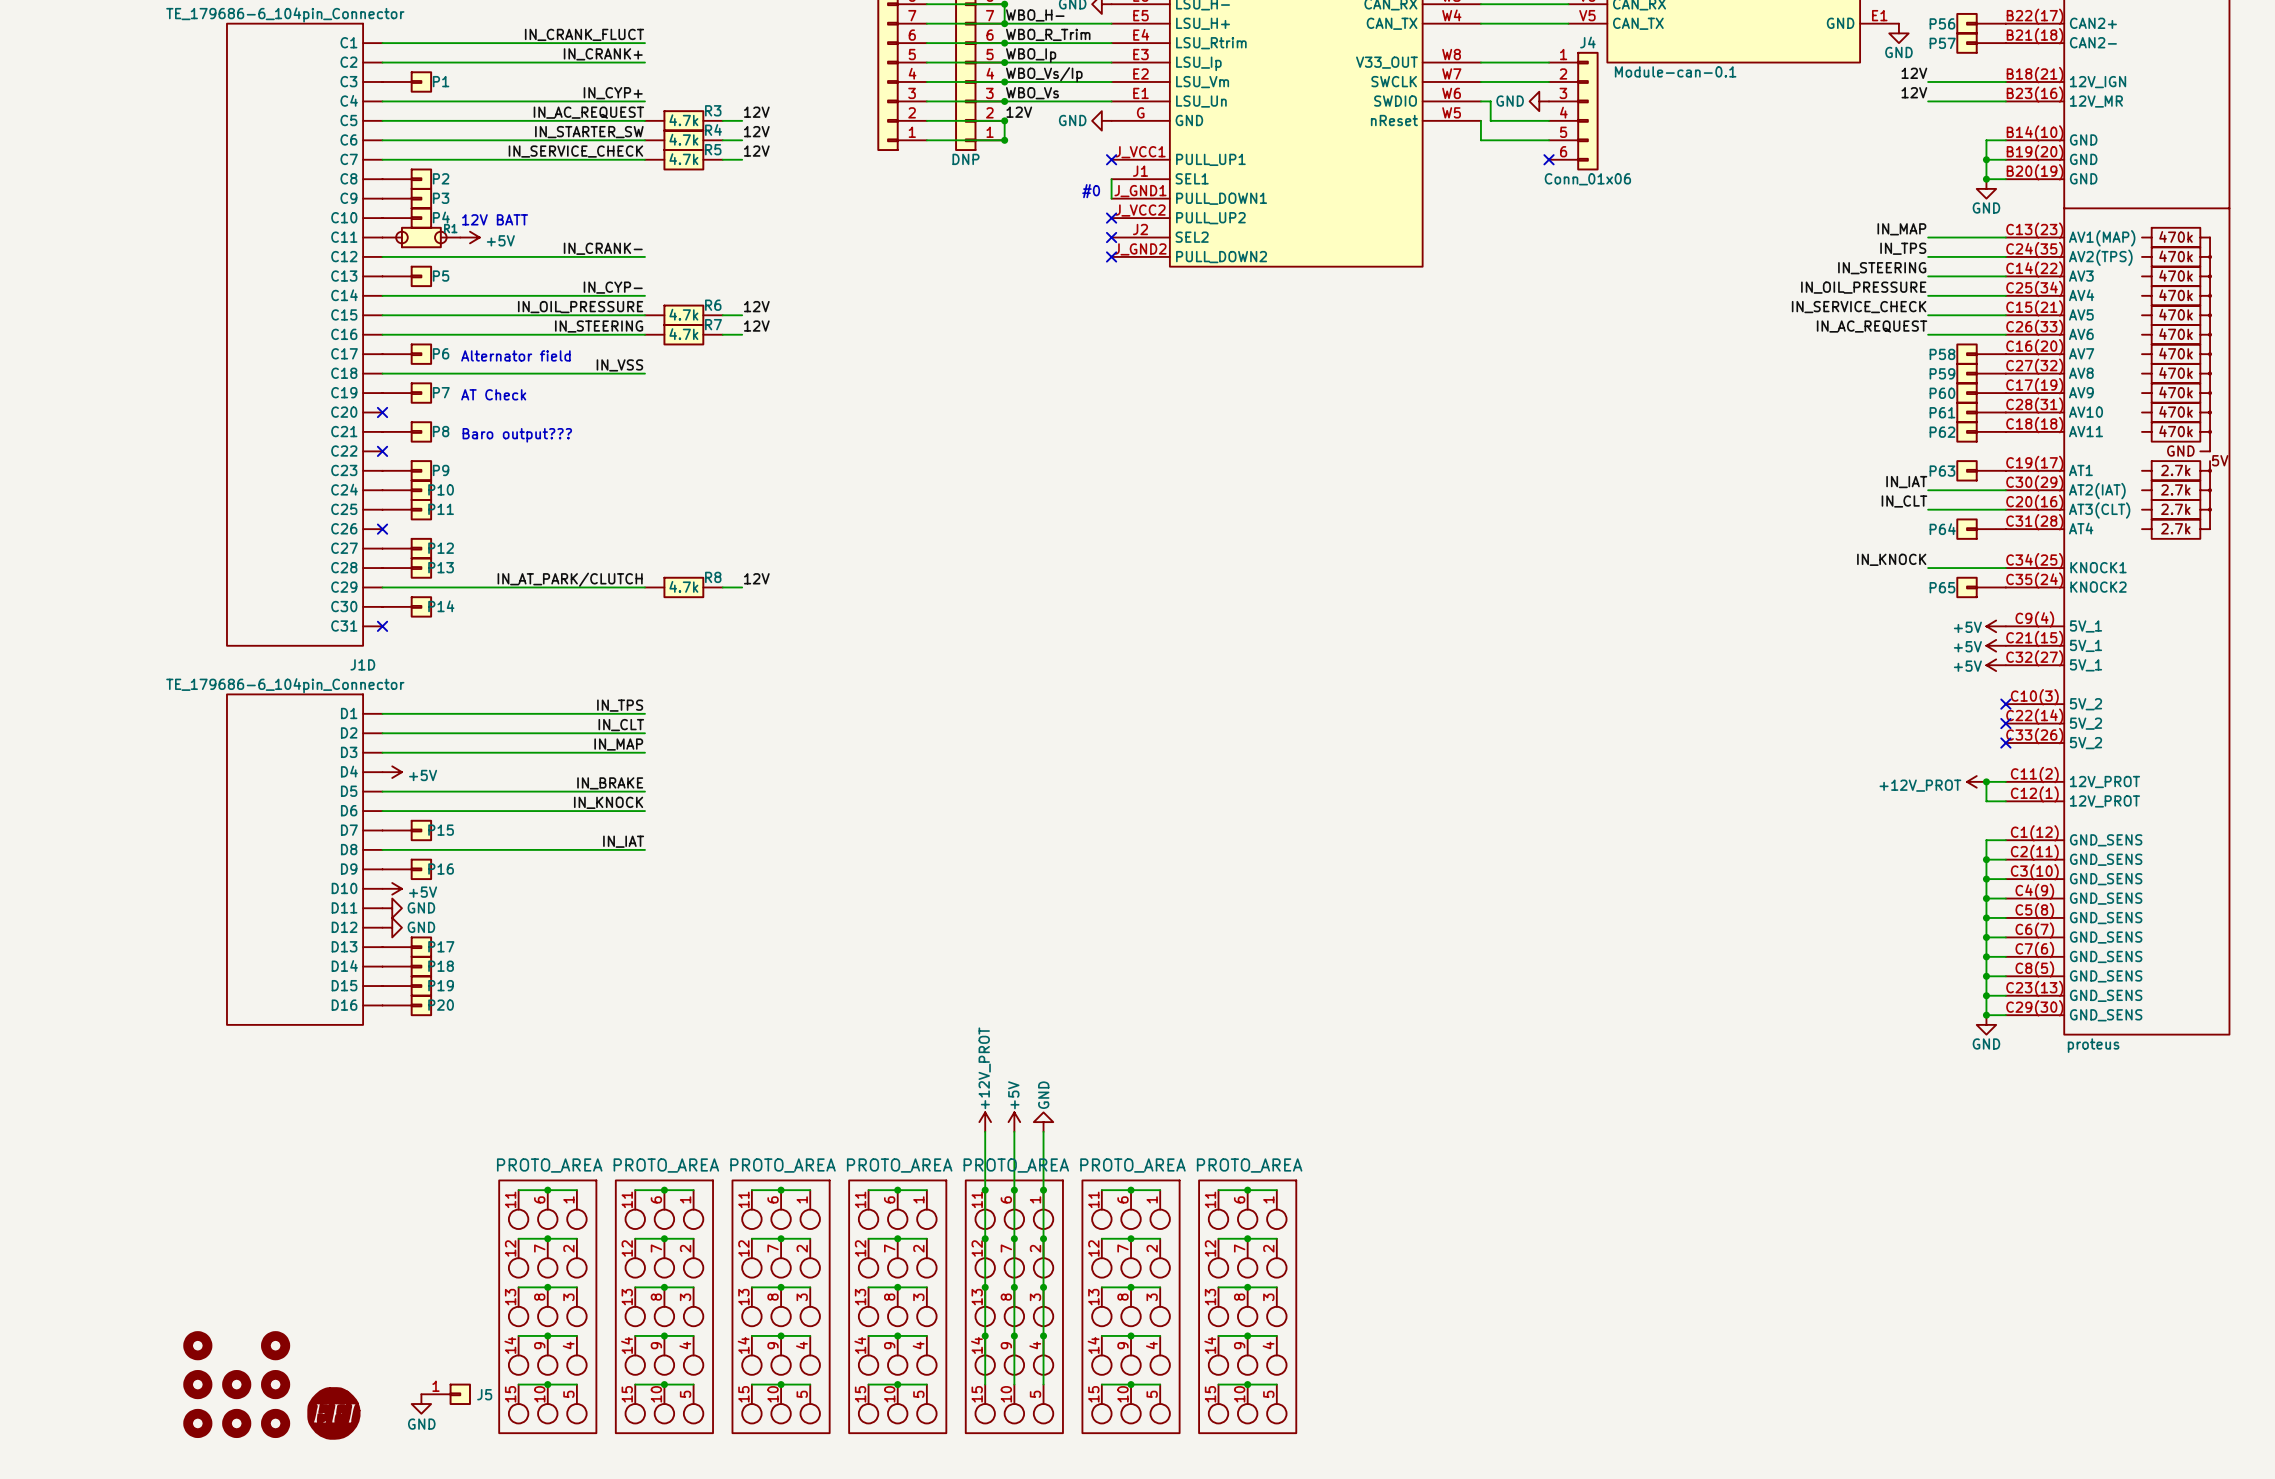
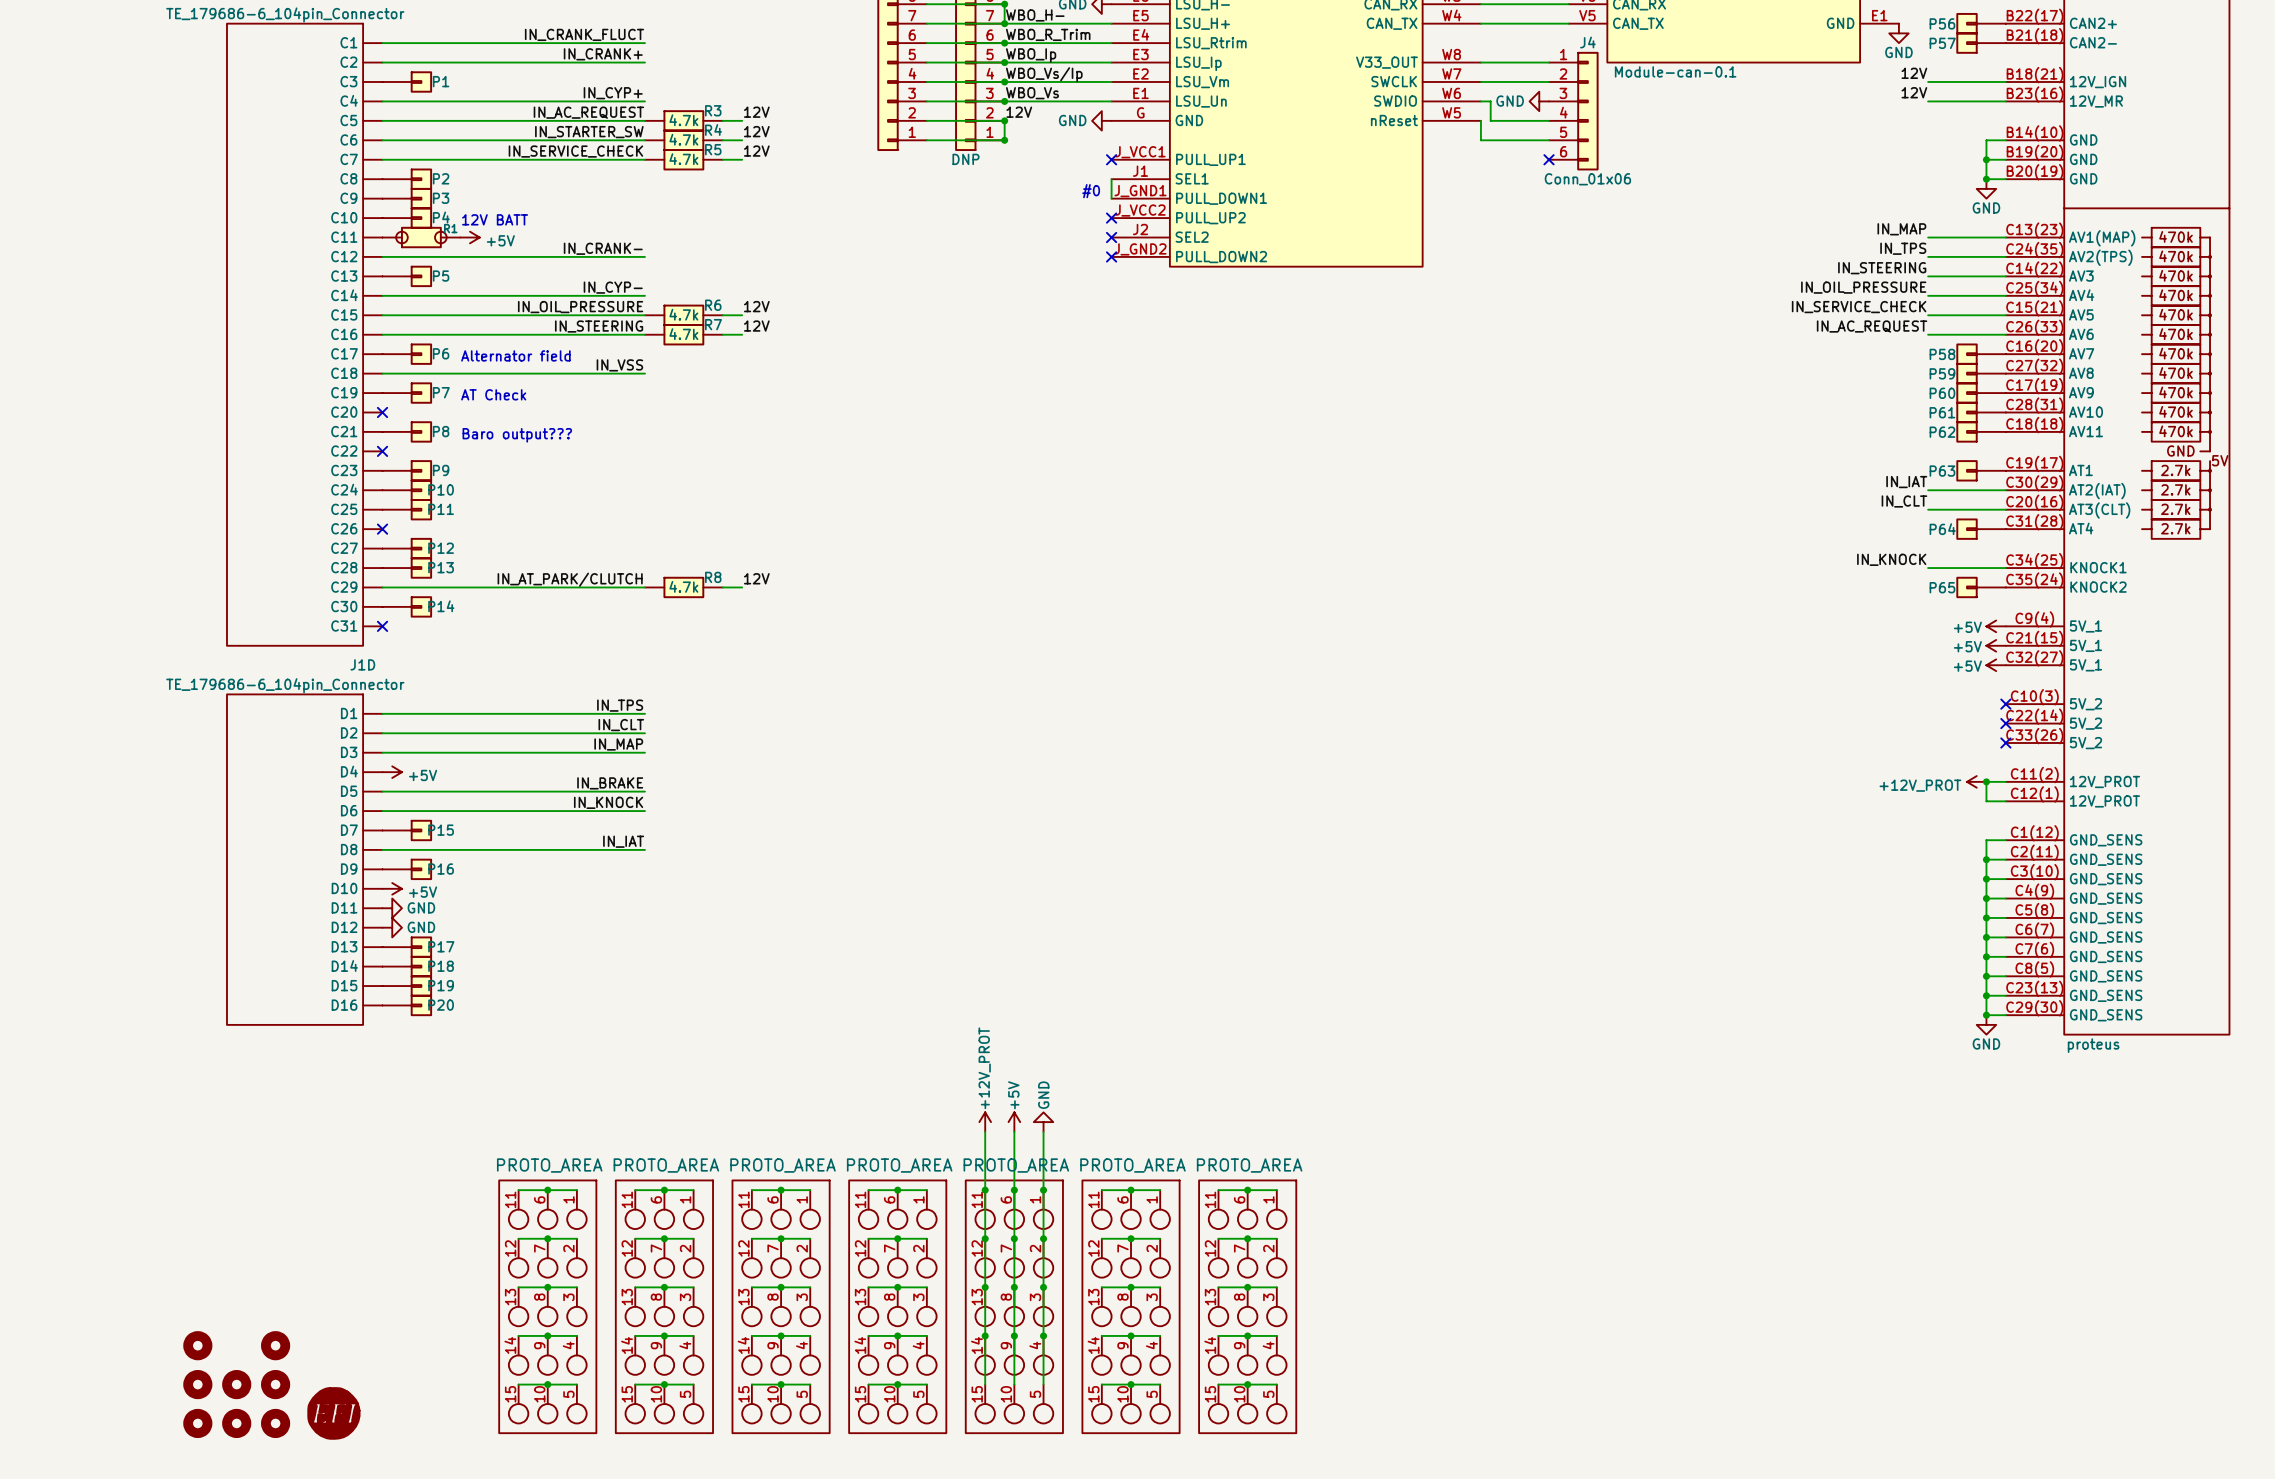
J5: (446, 1394) -> none
power symbol: GND (421, 1404) -> none

